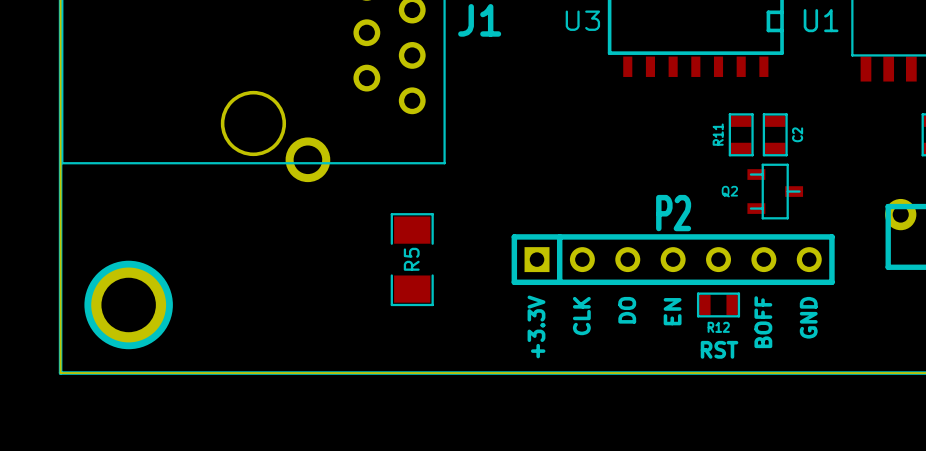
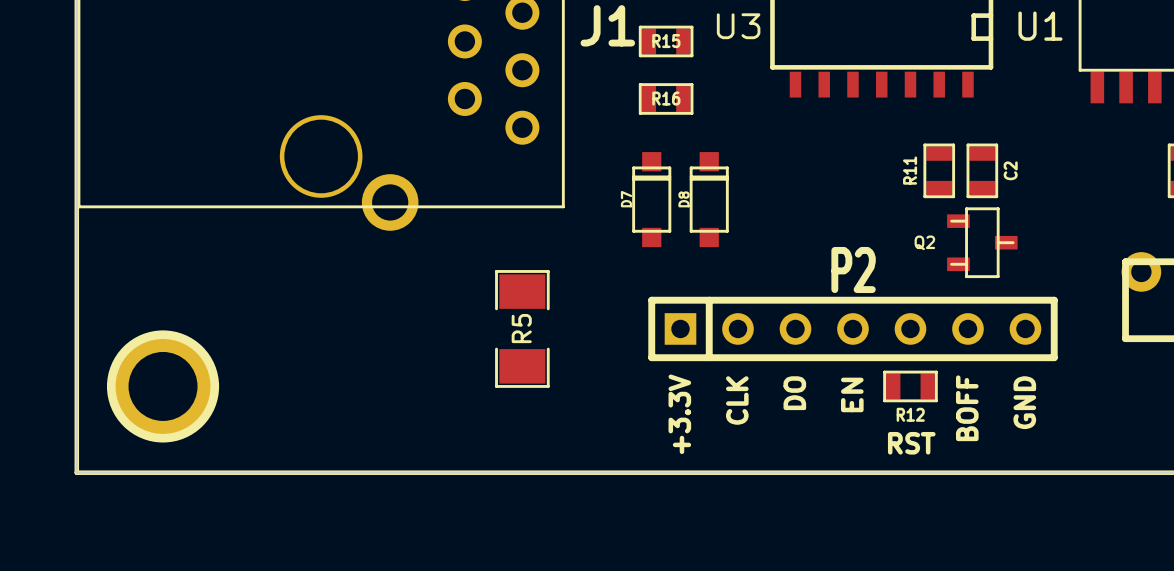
R15: none -> (666, 41)
R16: none -> (666, 98)
D7: none -> (651, 199)
D8: none -> (709, 199)

